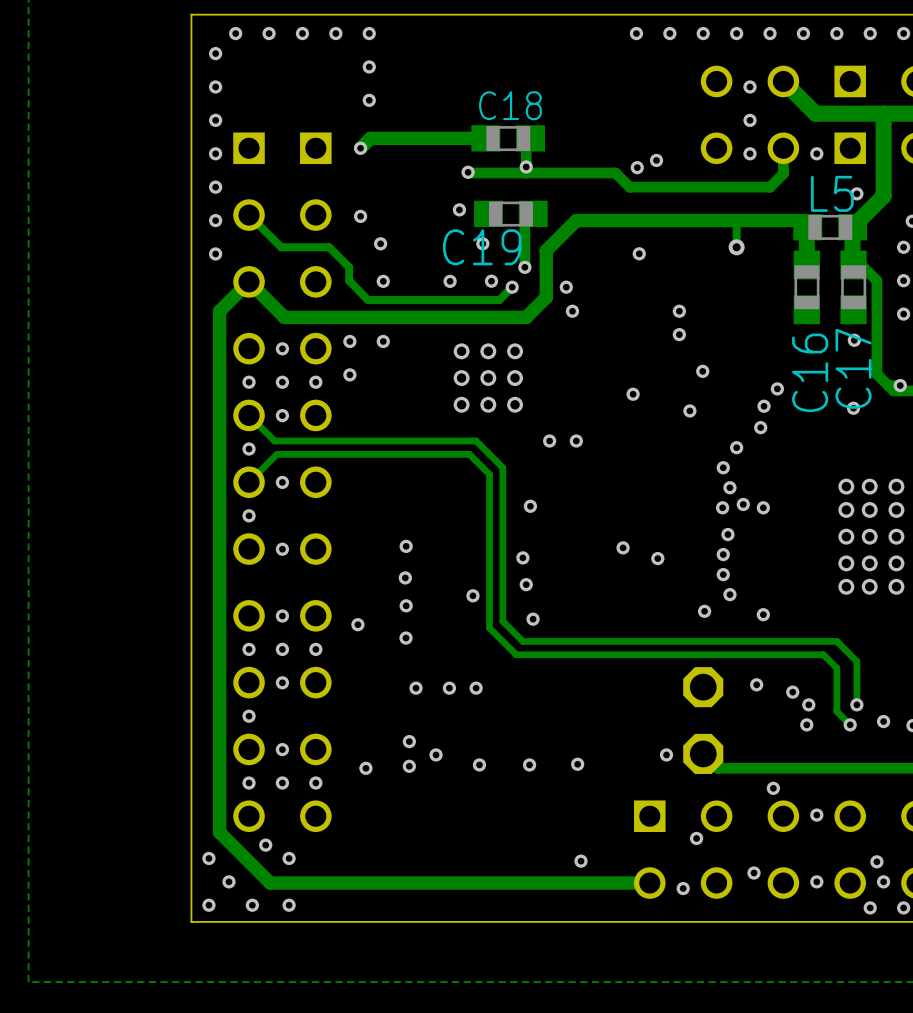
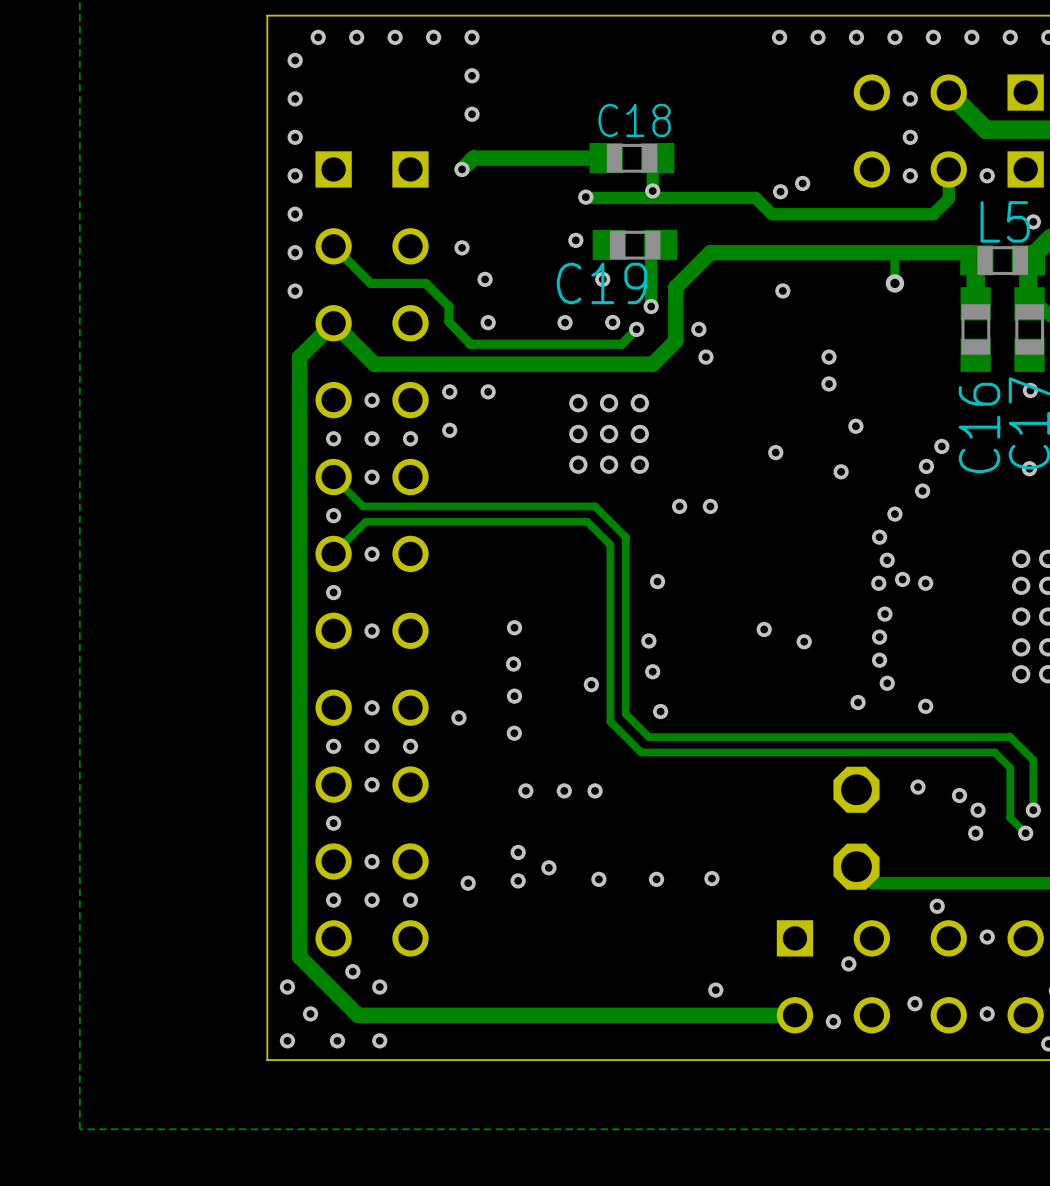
via: (666, 754) -> none

